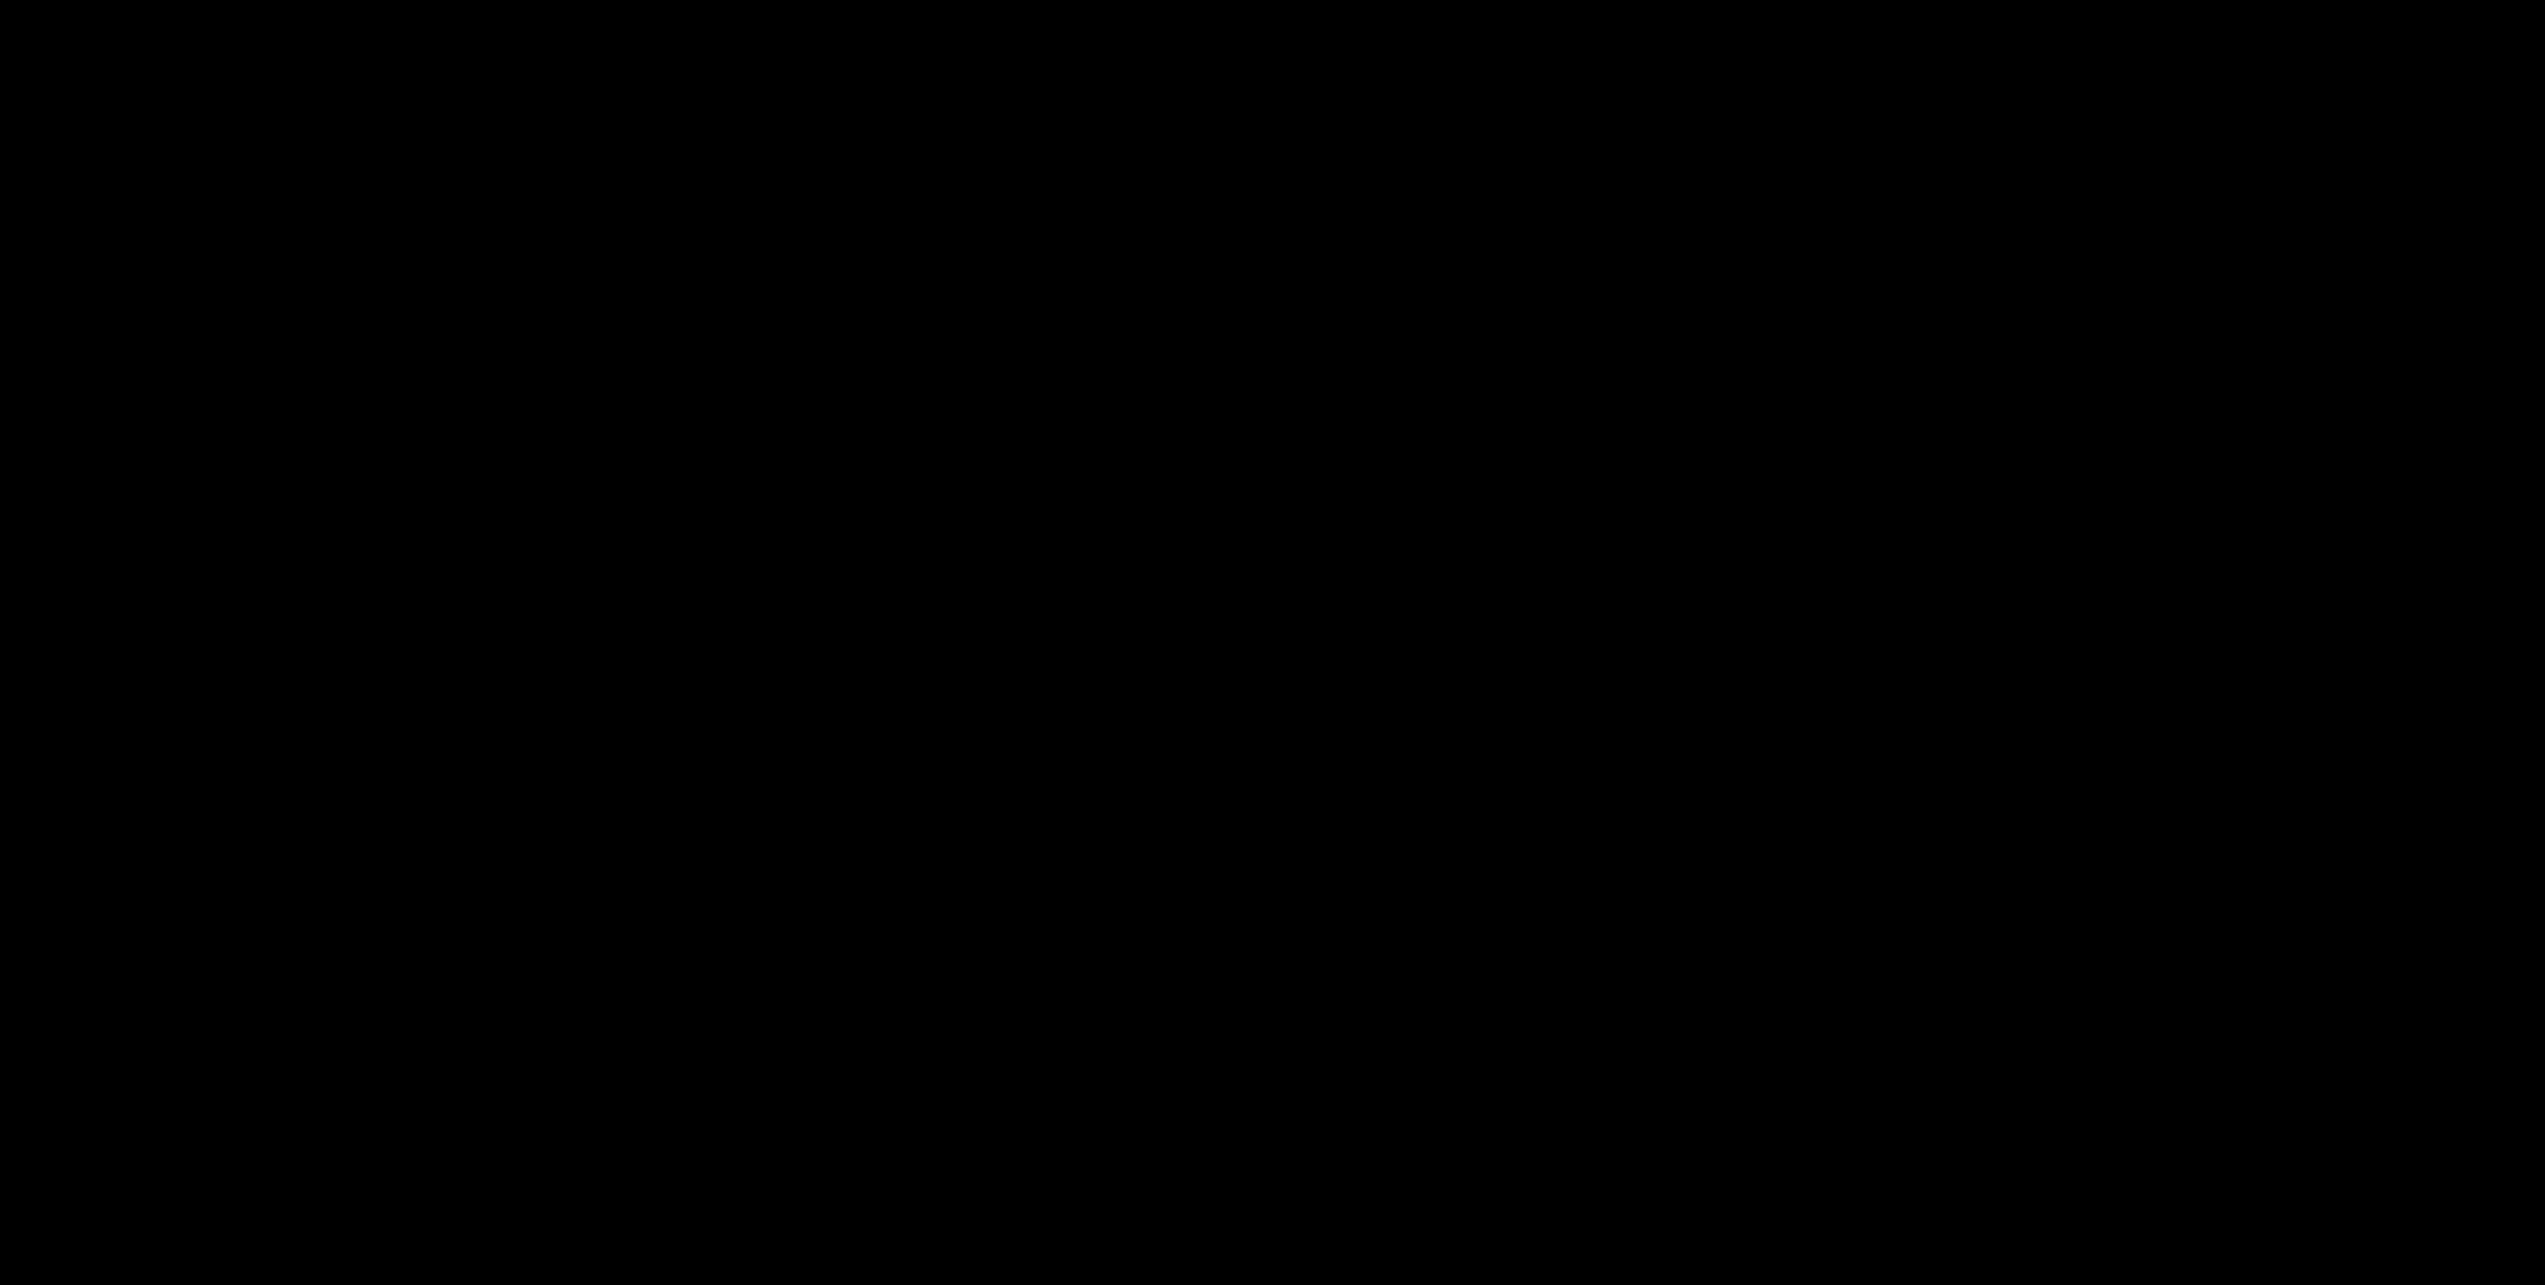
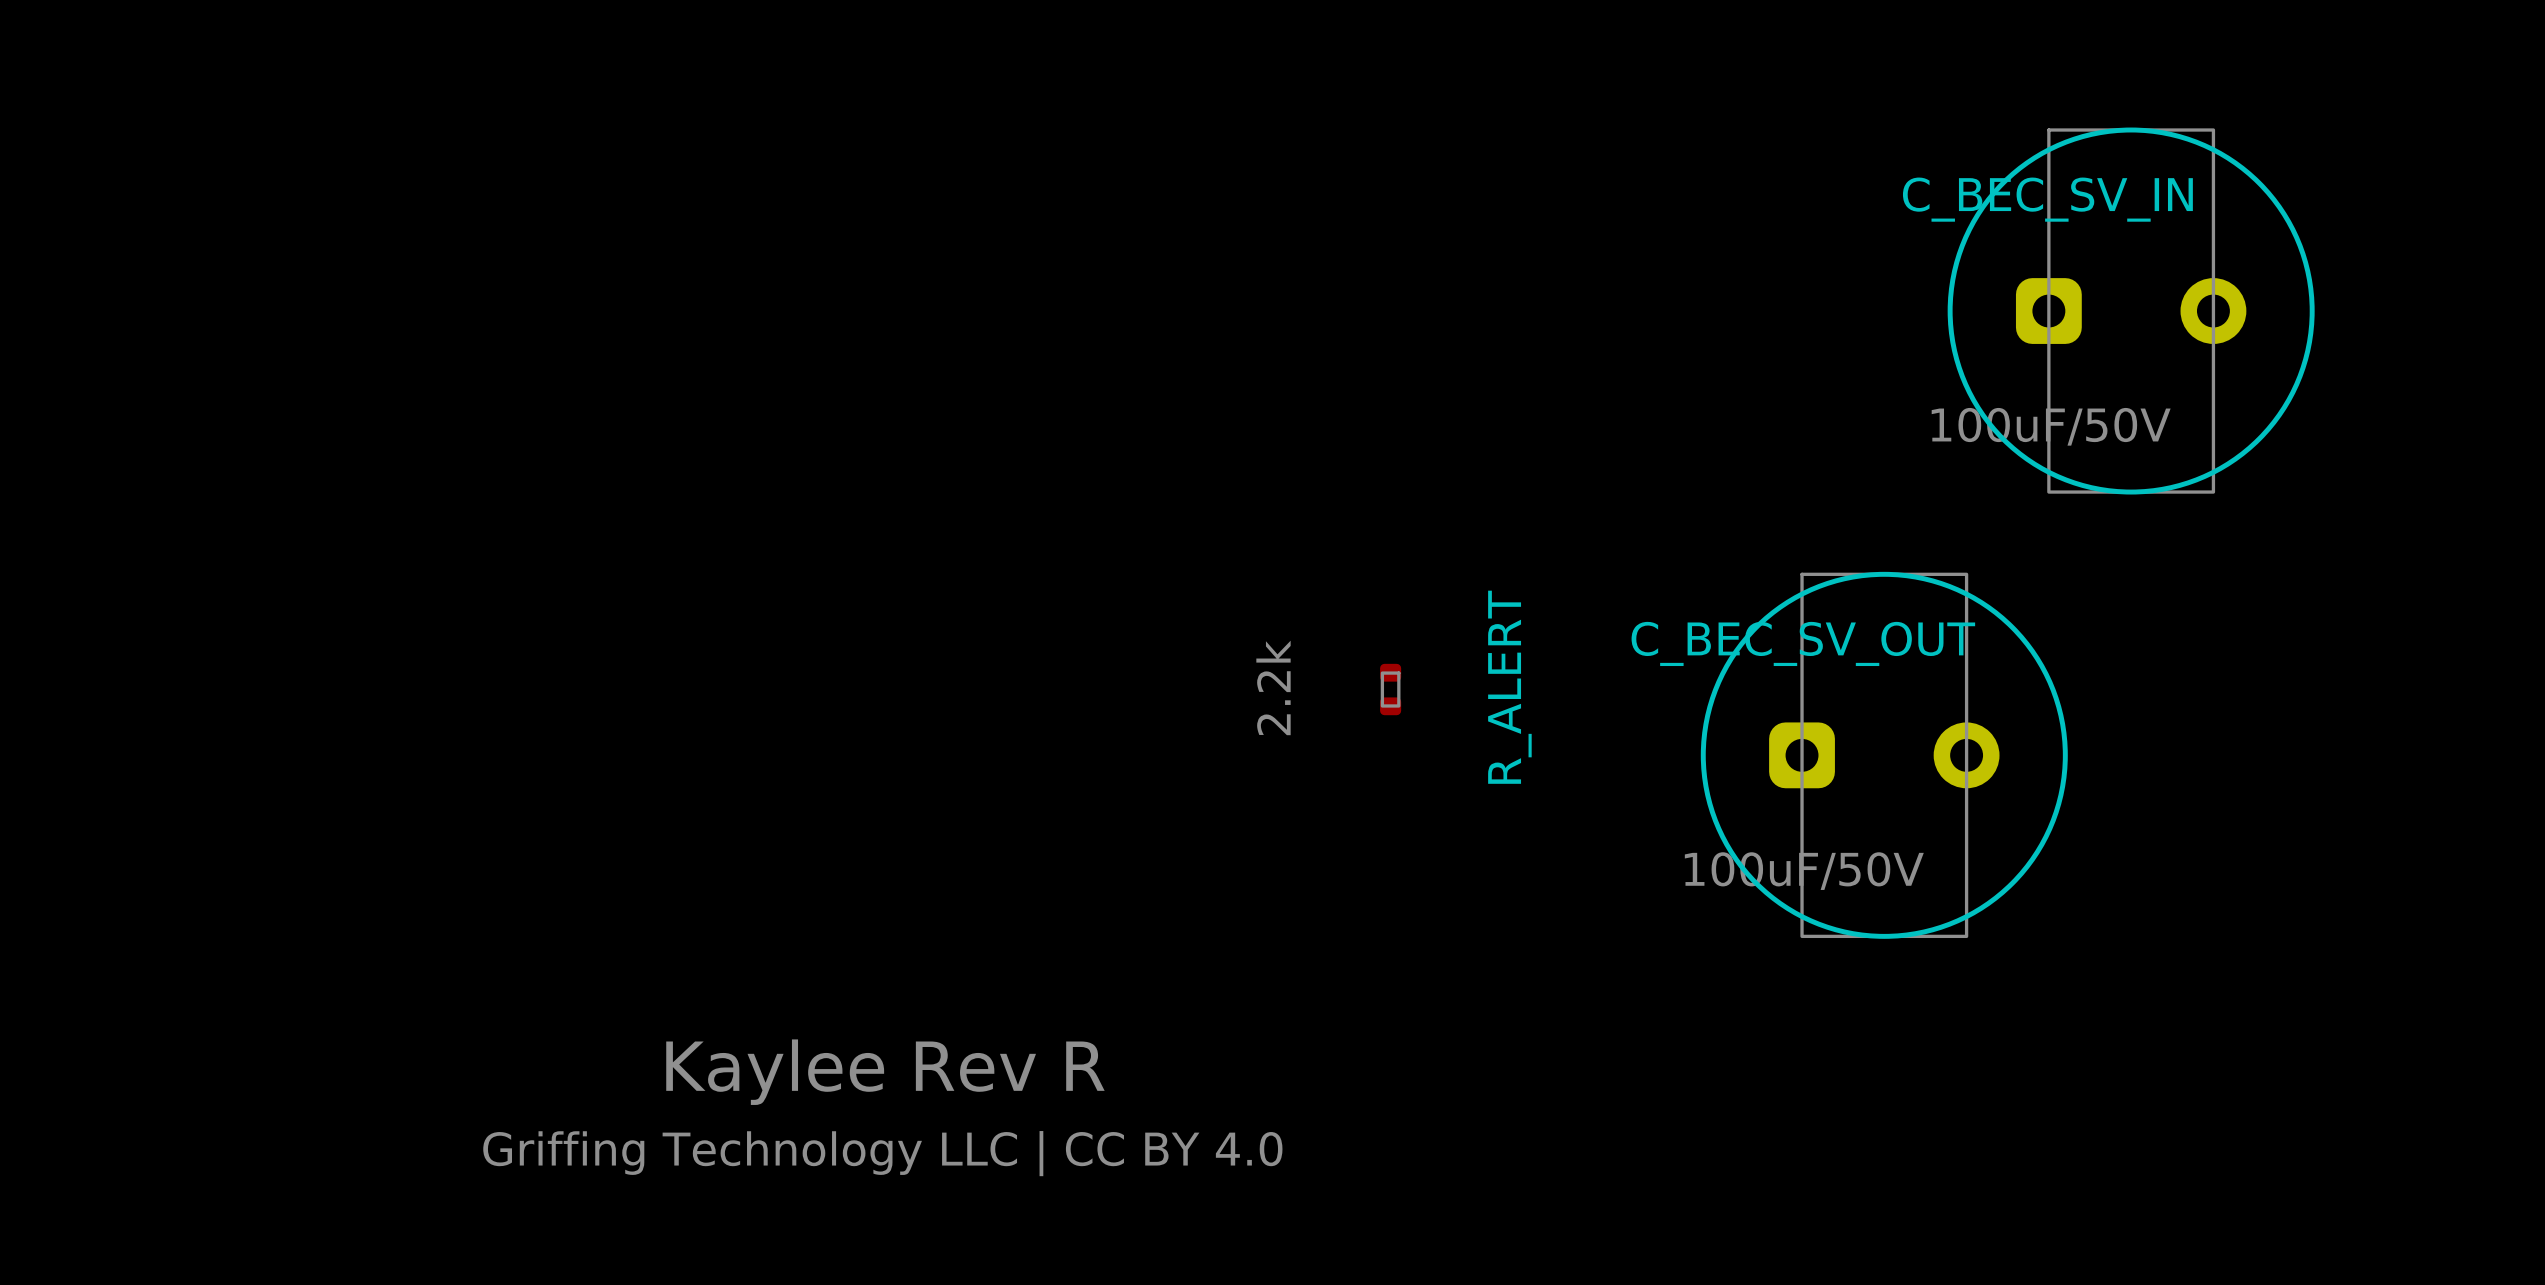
C_BEC_SV_IN: none -> 100uF/50V (2131, 311)
R_ALERT: none -> 2.2k (1390, 689)
C_BEC_SV_OUT: none -> 100uF/50V (1884, 755)
text: none -> Kaylee Rev R (885, 1072)
text: none -> Griffing Technology LLC | CC BY 4.0 (882, 1153)

